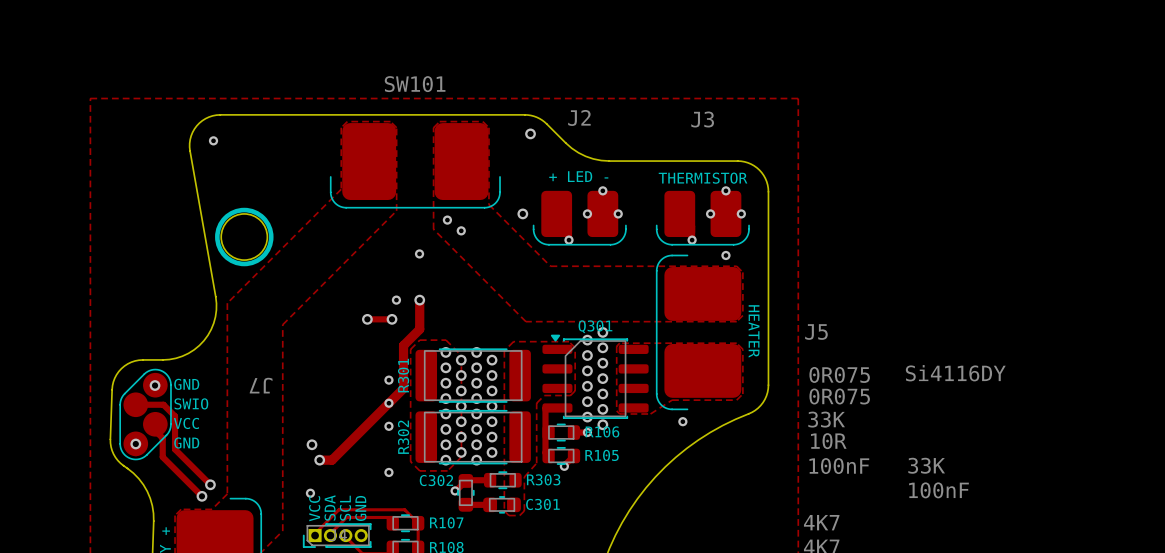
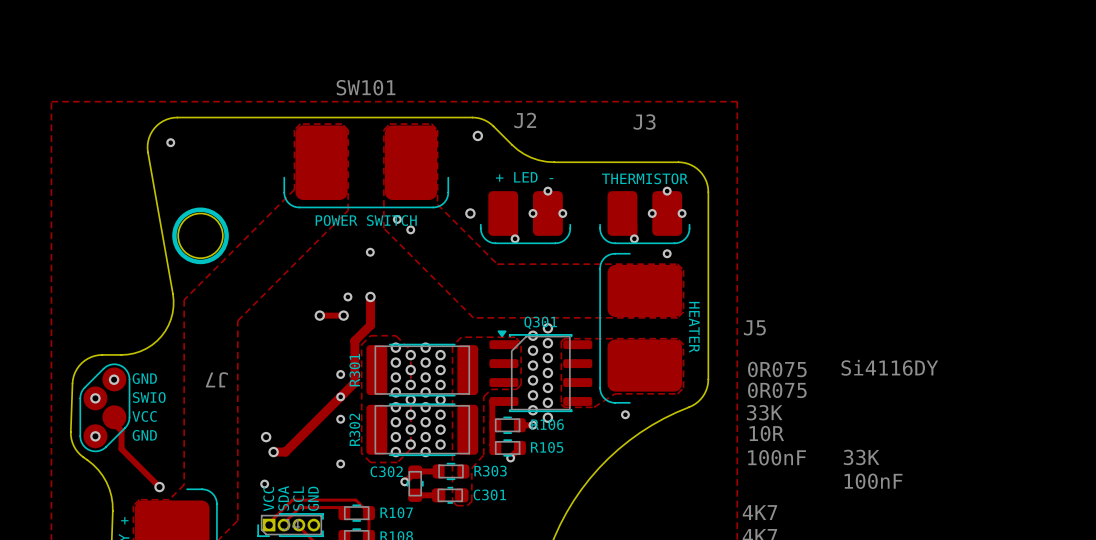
text: none -> POWER SWITCH (366, 220)
via: none -> (95, 398)
track: (136, 404) (163, 404) (175, 416) (175, 449) (210, 484) -> none
via: (210, 484) -> none

